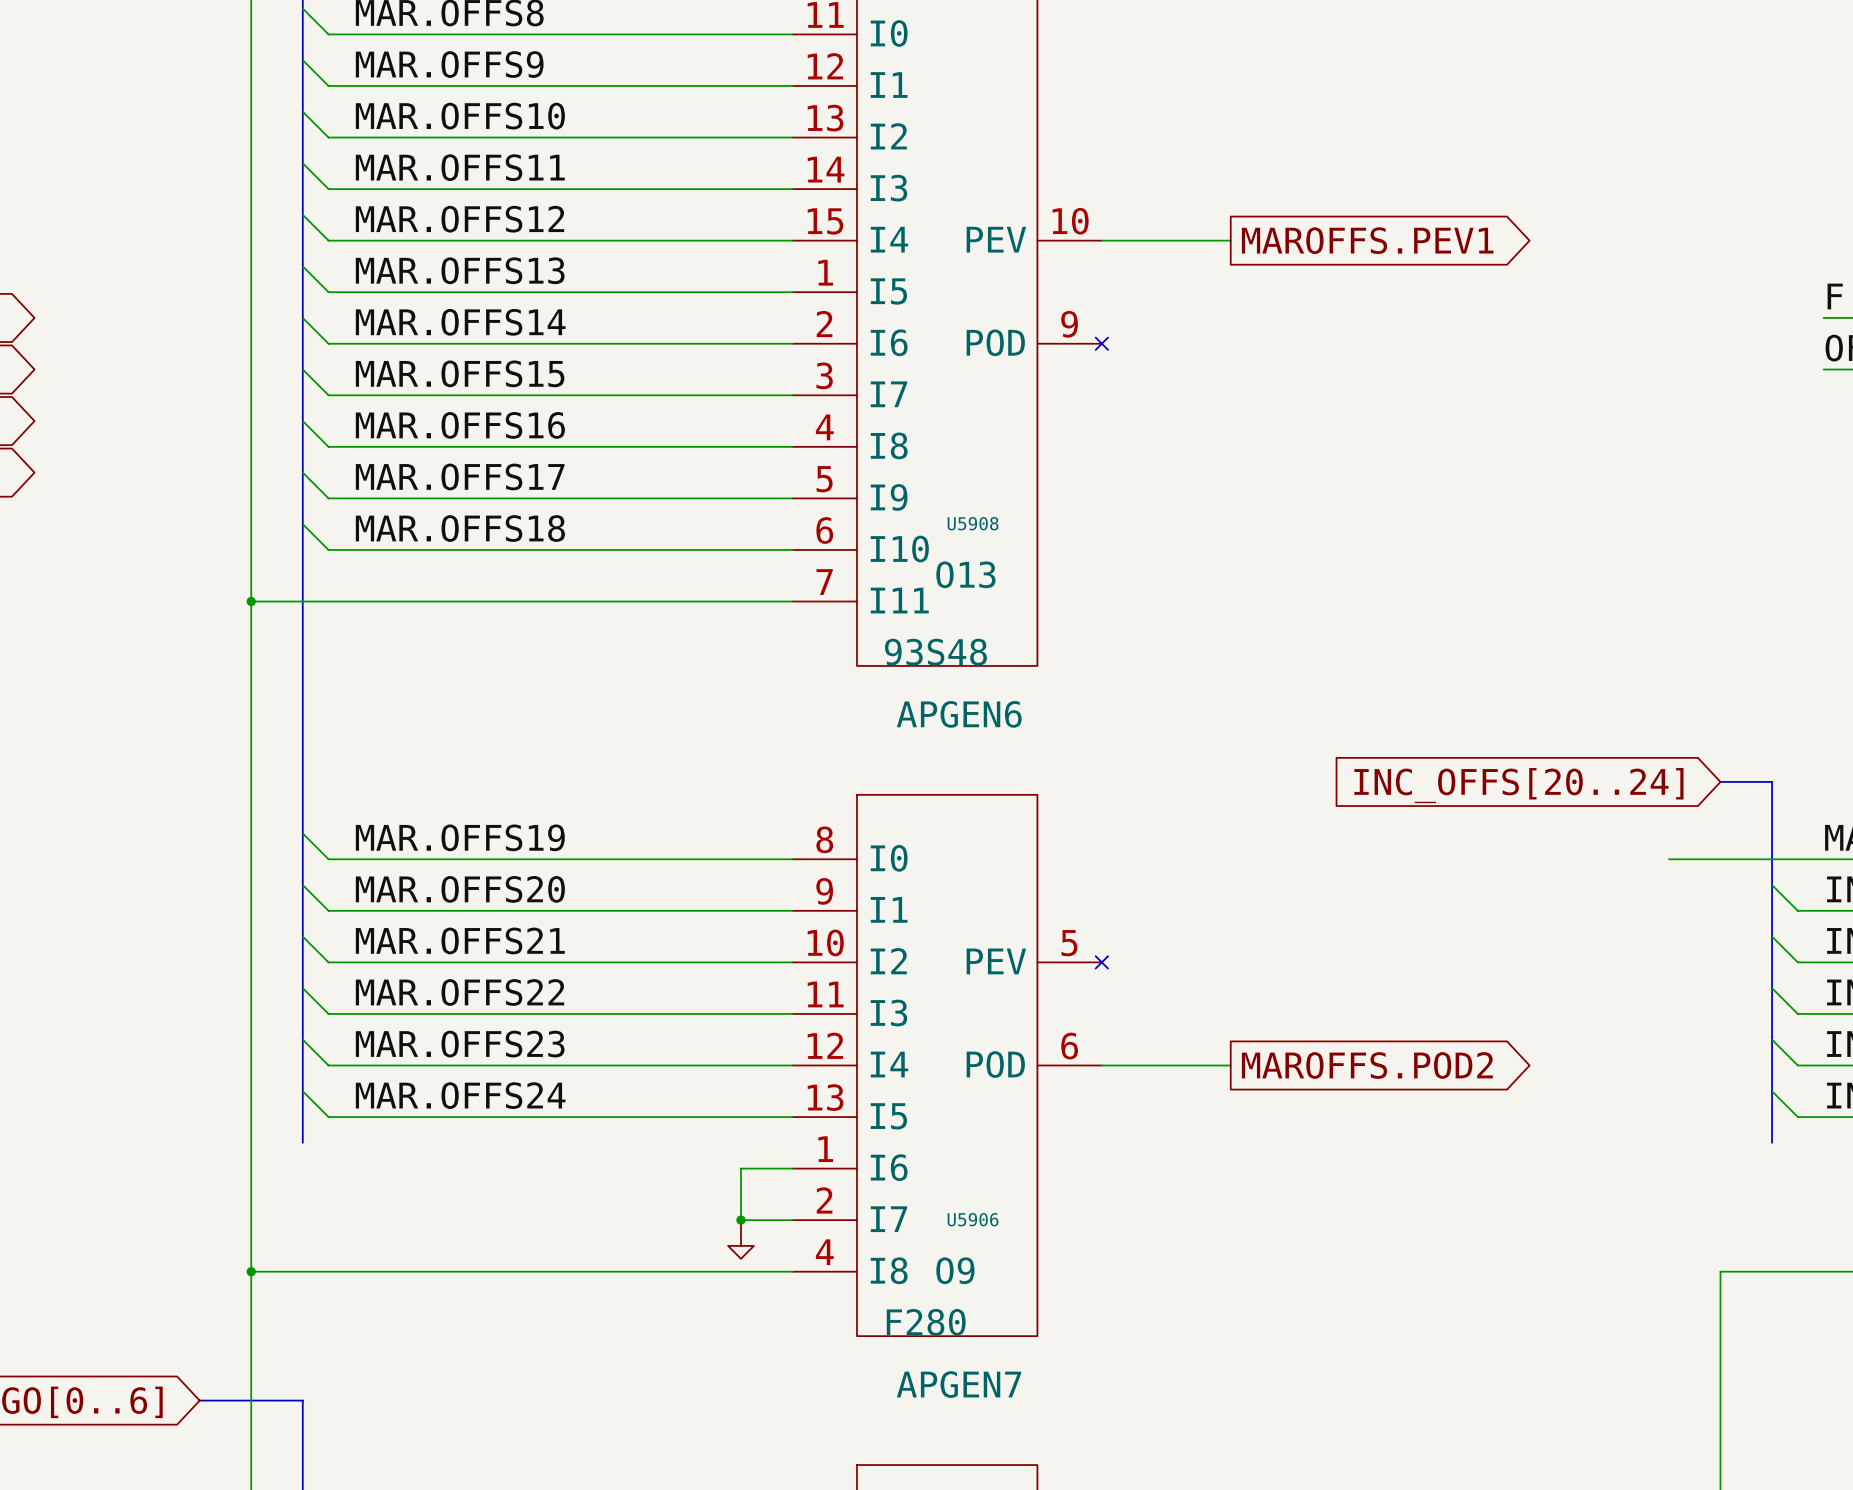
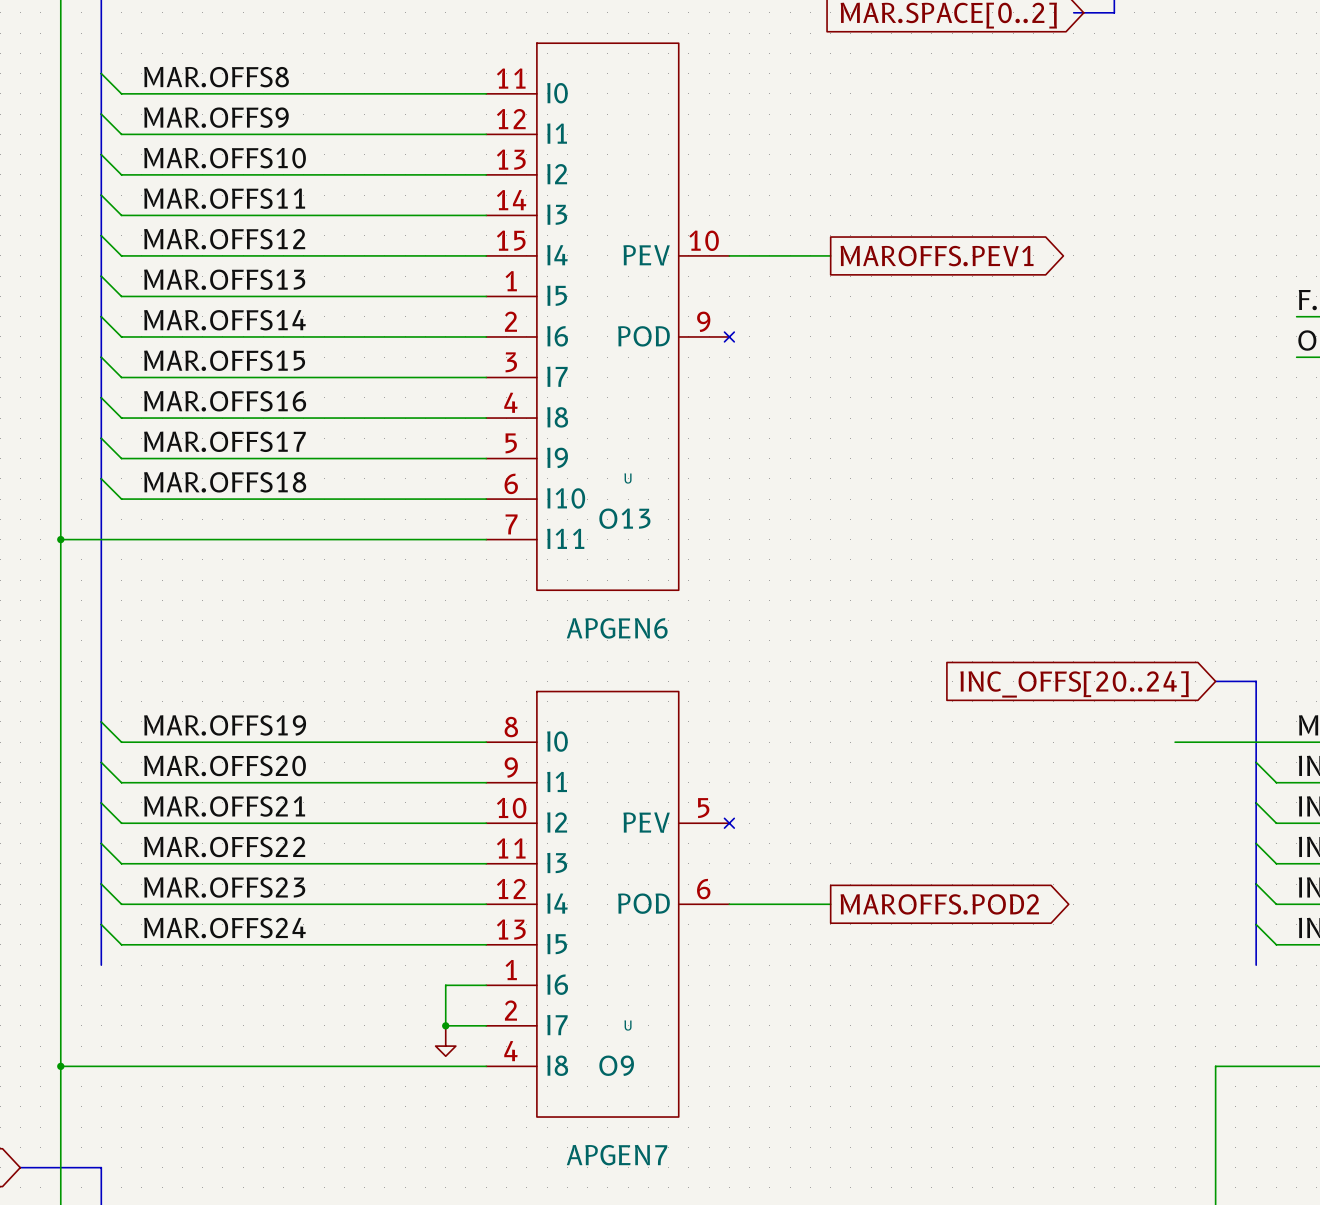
U5908 name: U5908 (973, 523) -> U (627, 478)
U5908 value: 93S48 (935, 652) -> none
U5906 name: U5906 (973, 1219) -> U (627, 1025)
U5906 value: F280 (926, 1322) -> none

